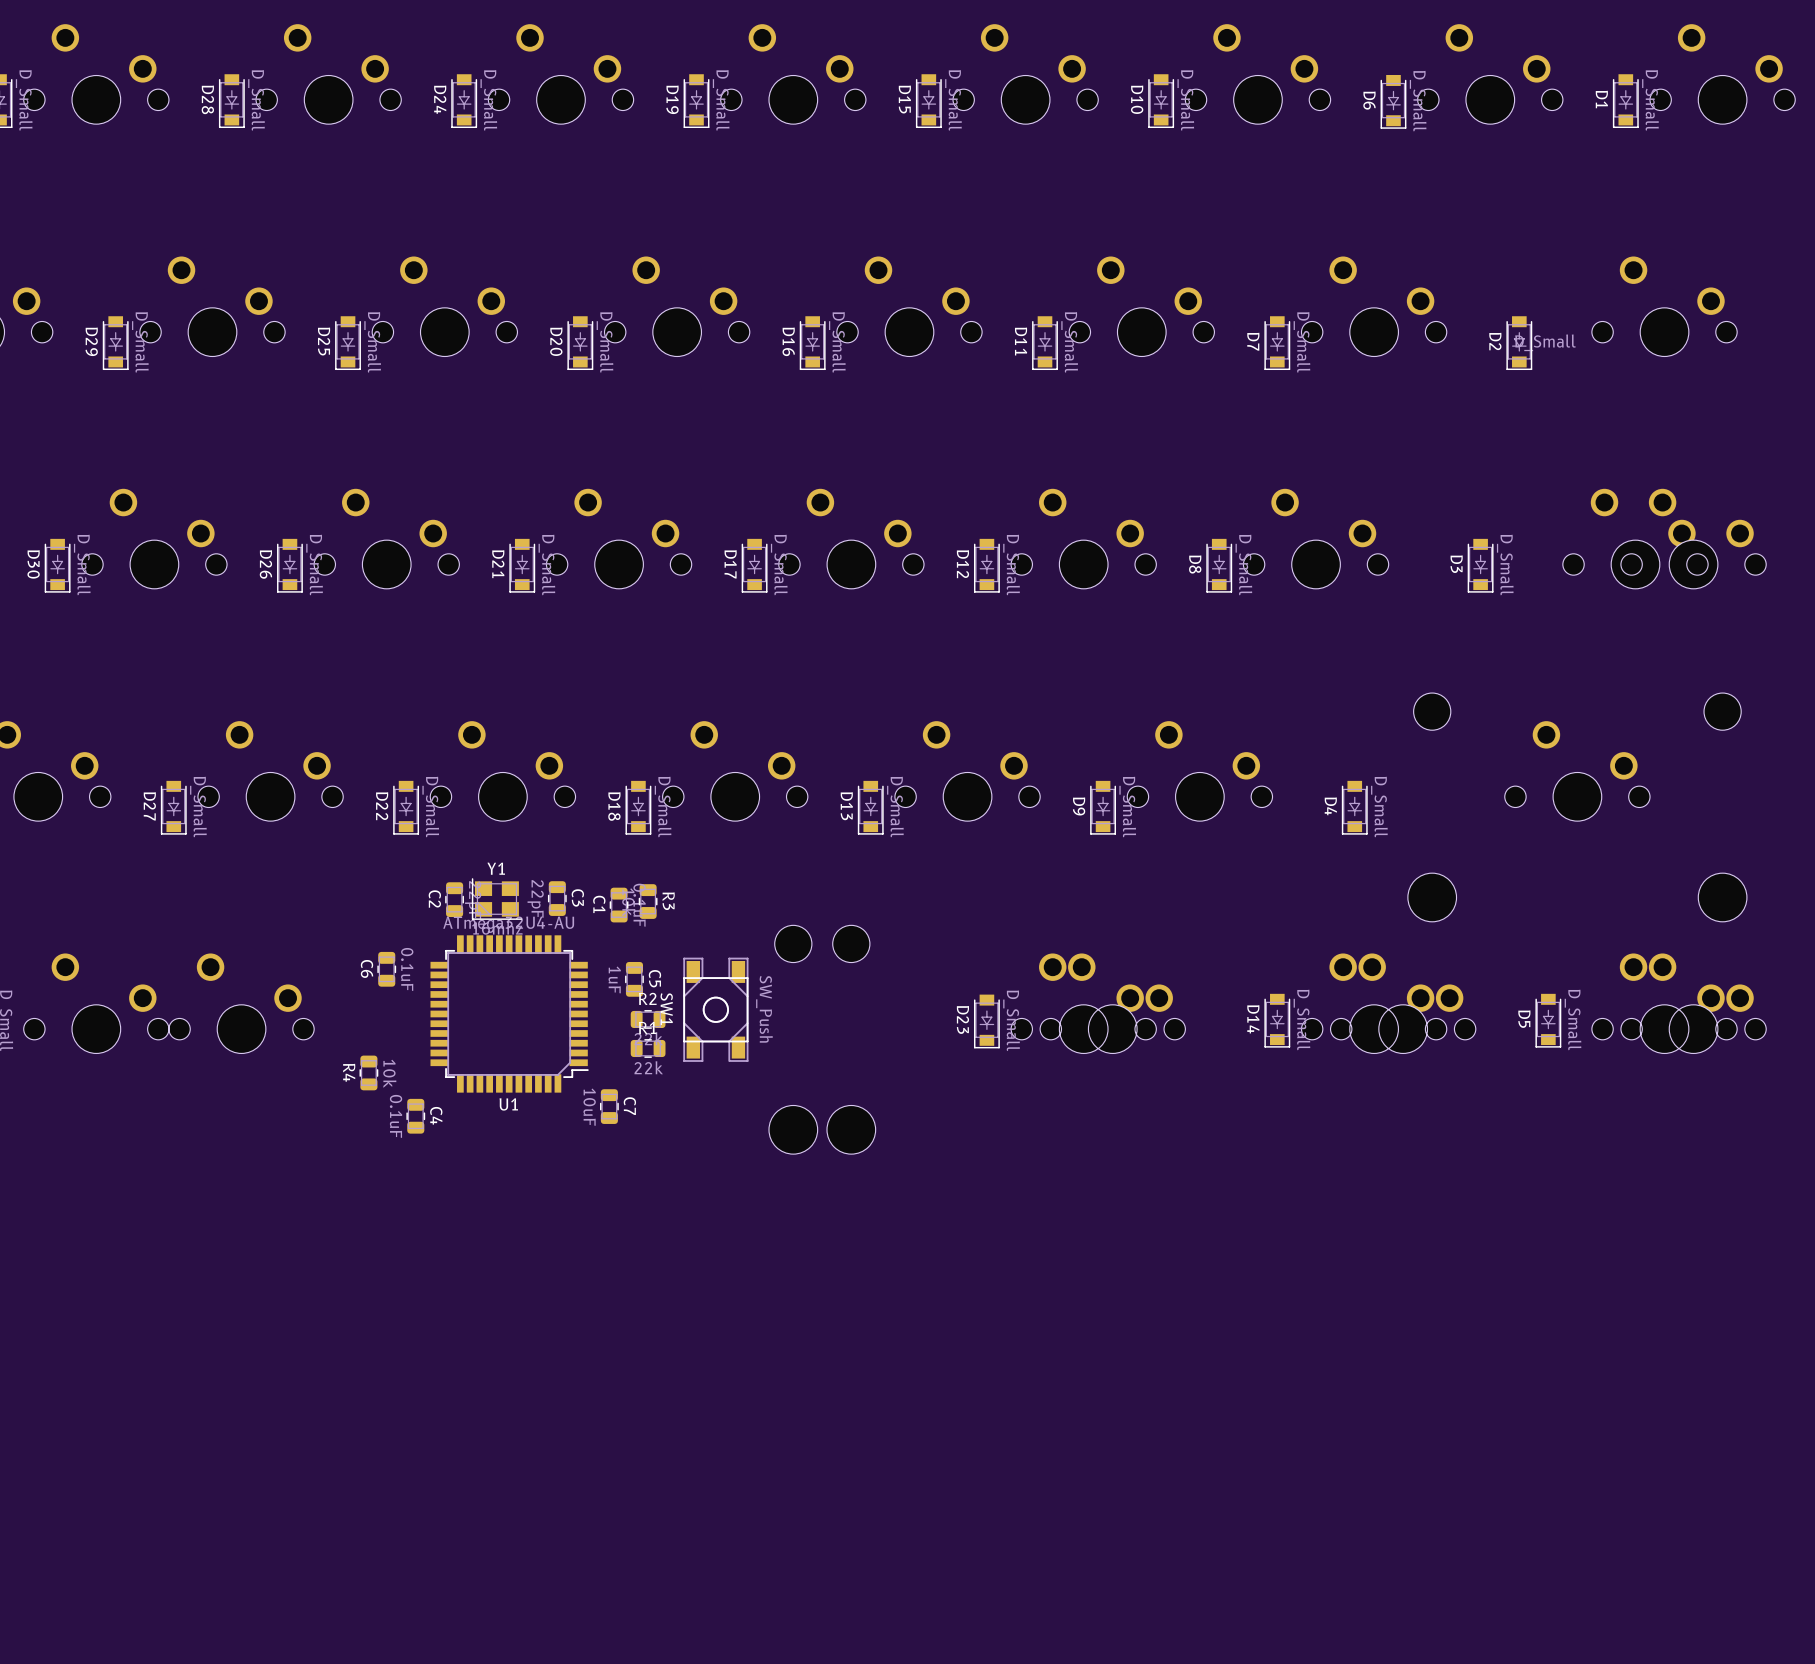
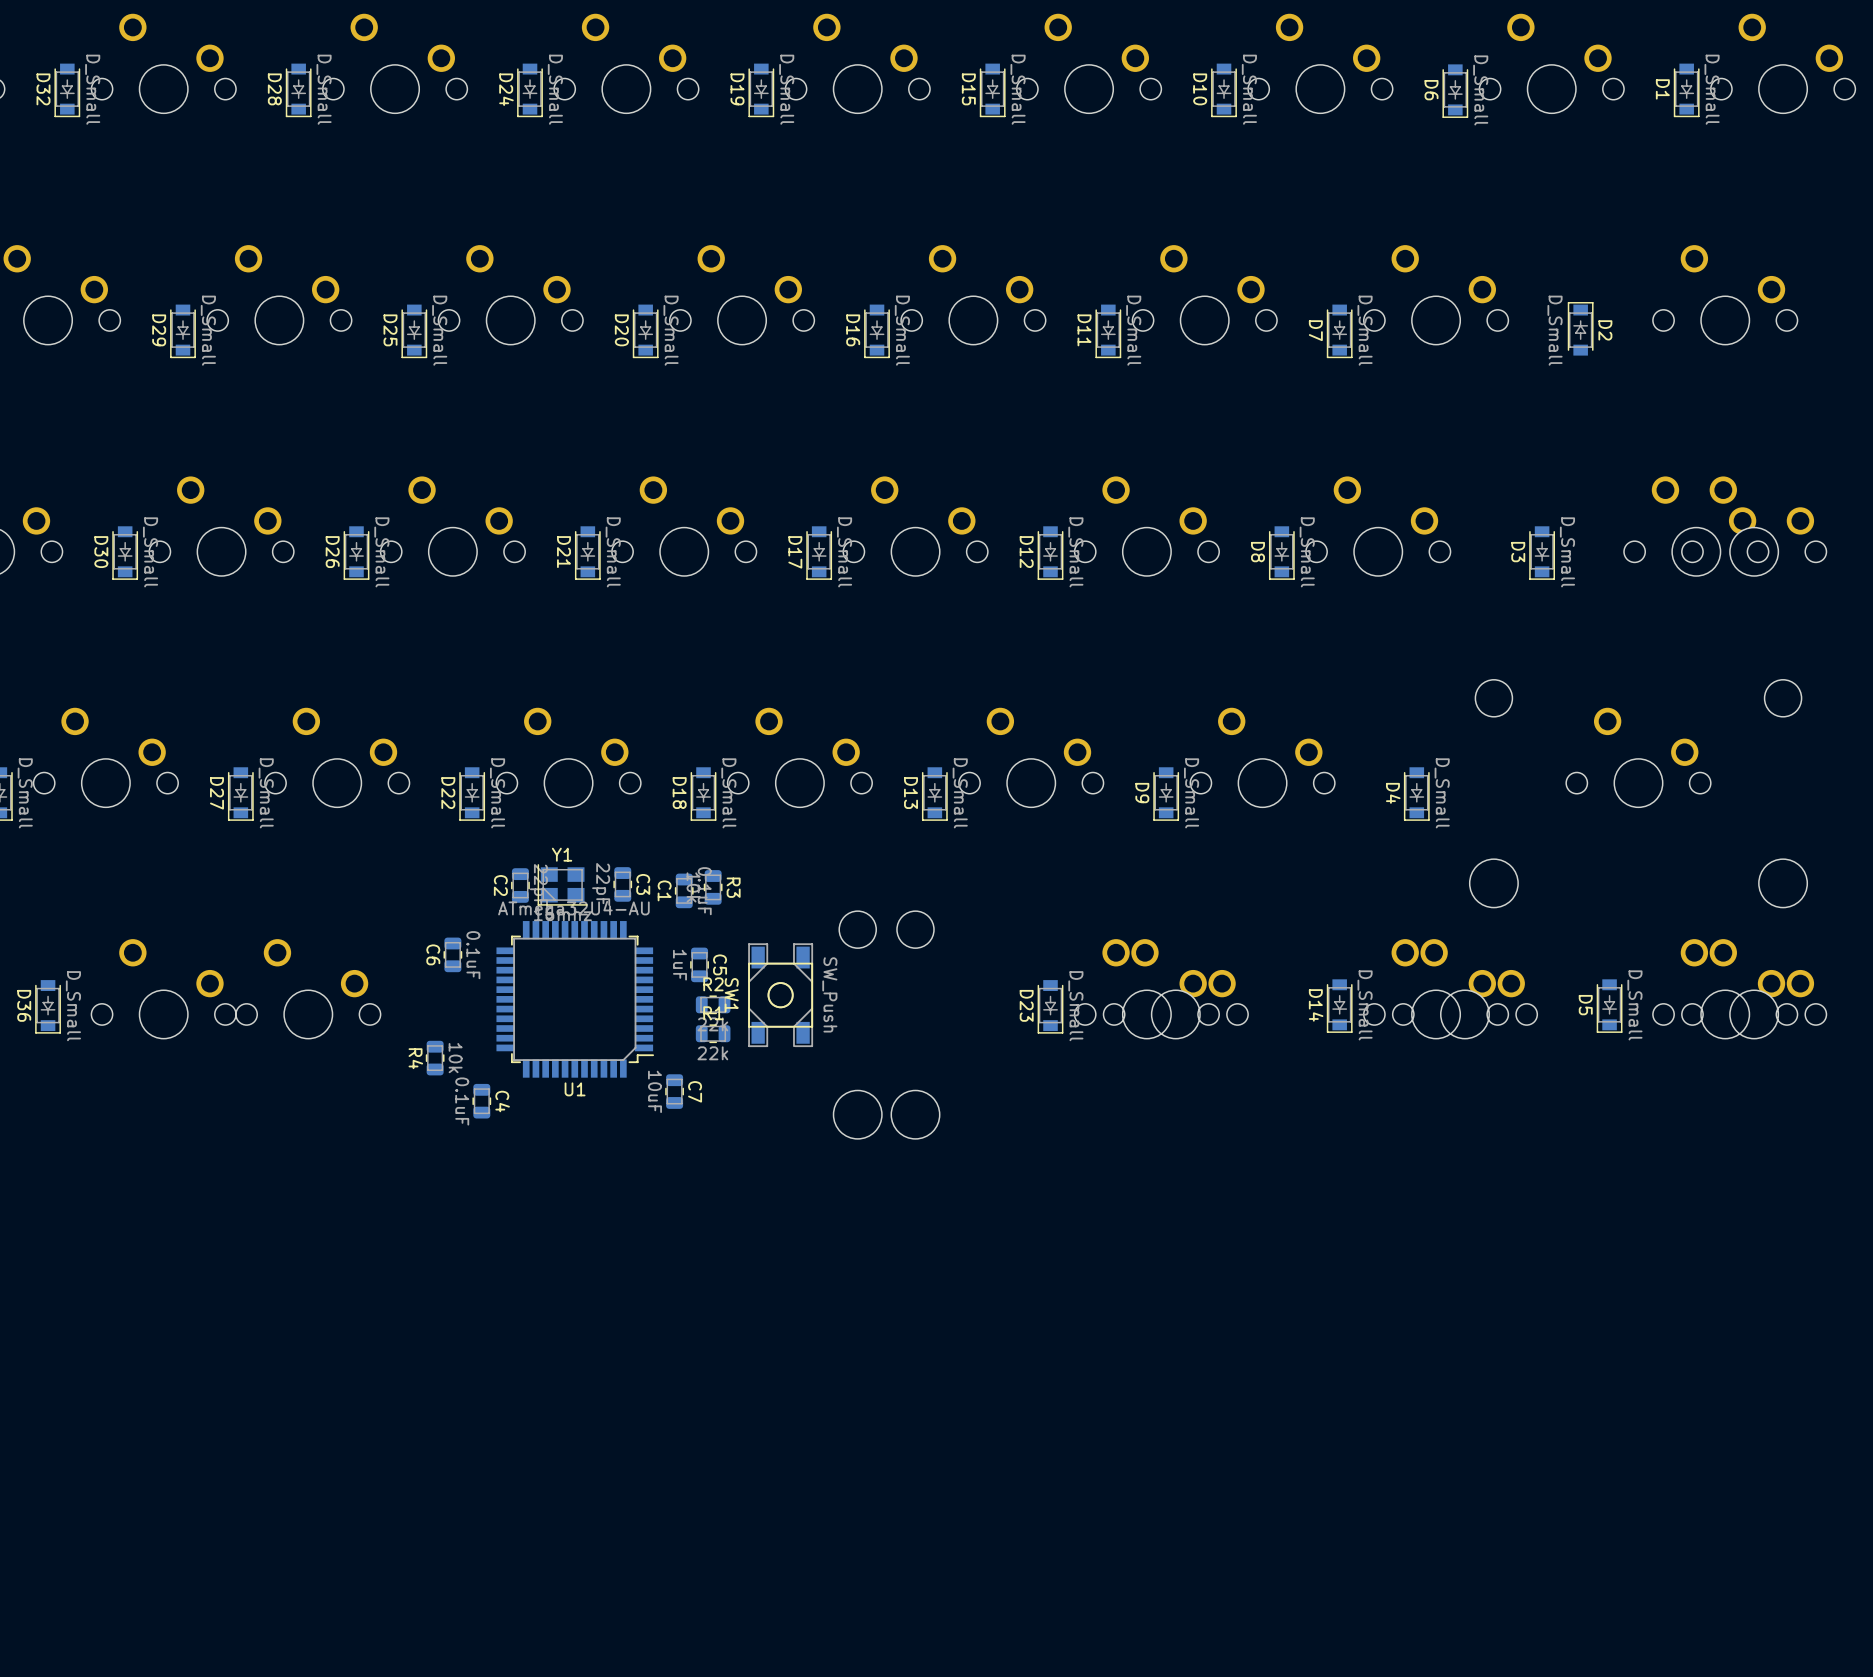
D2 rotation: 0° (1519, 343) -> 180° (1580, 328)

